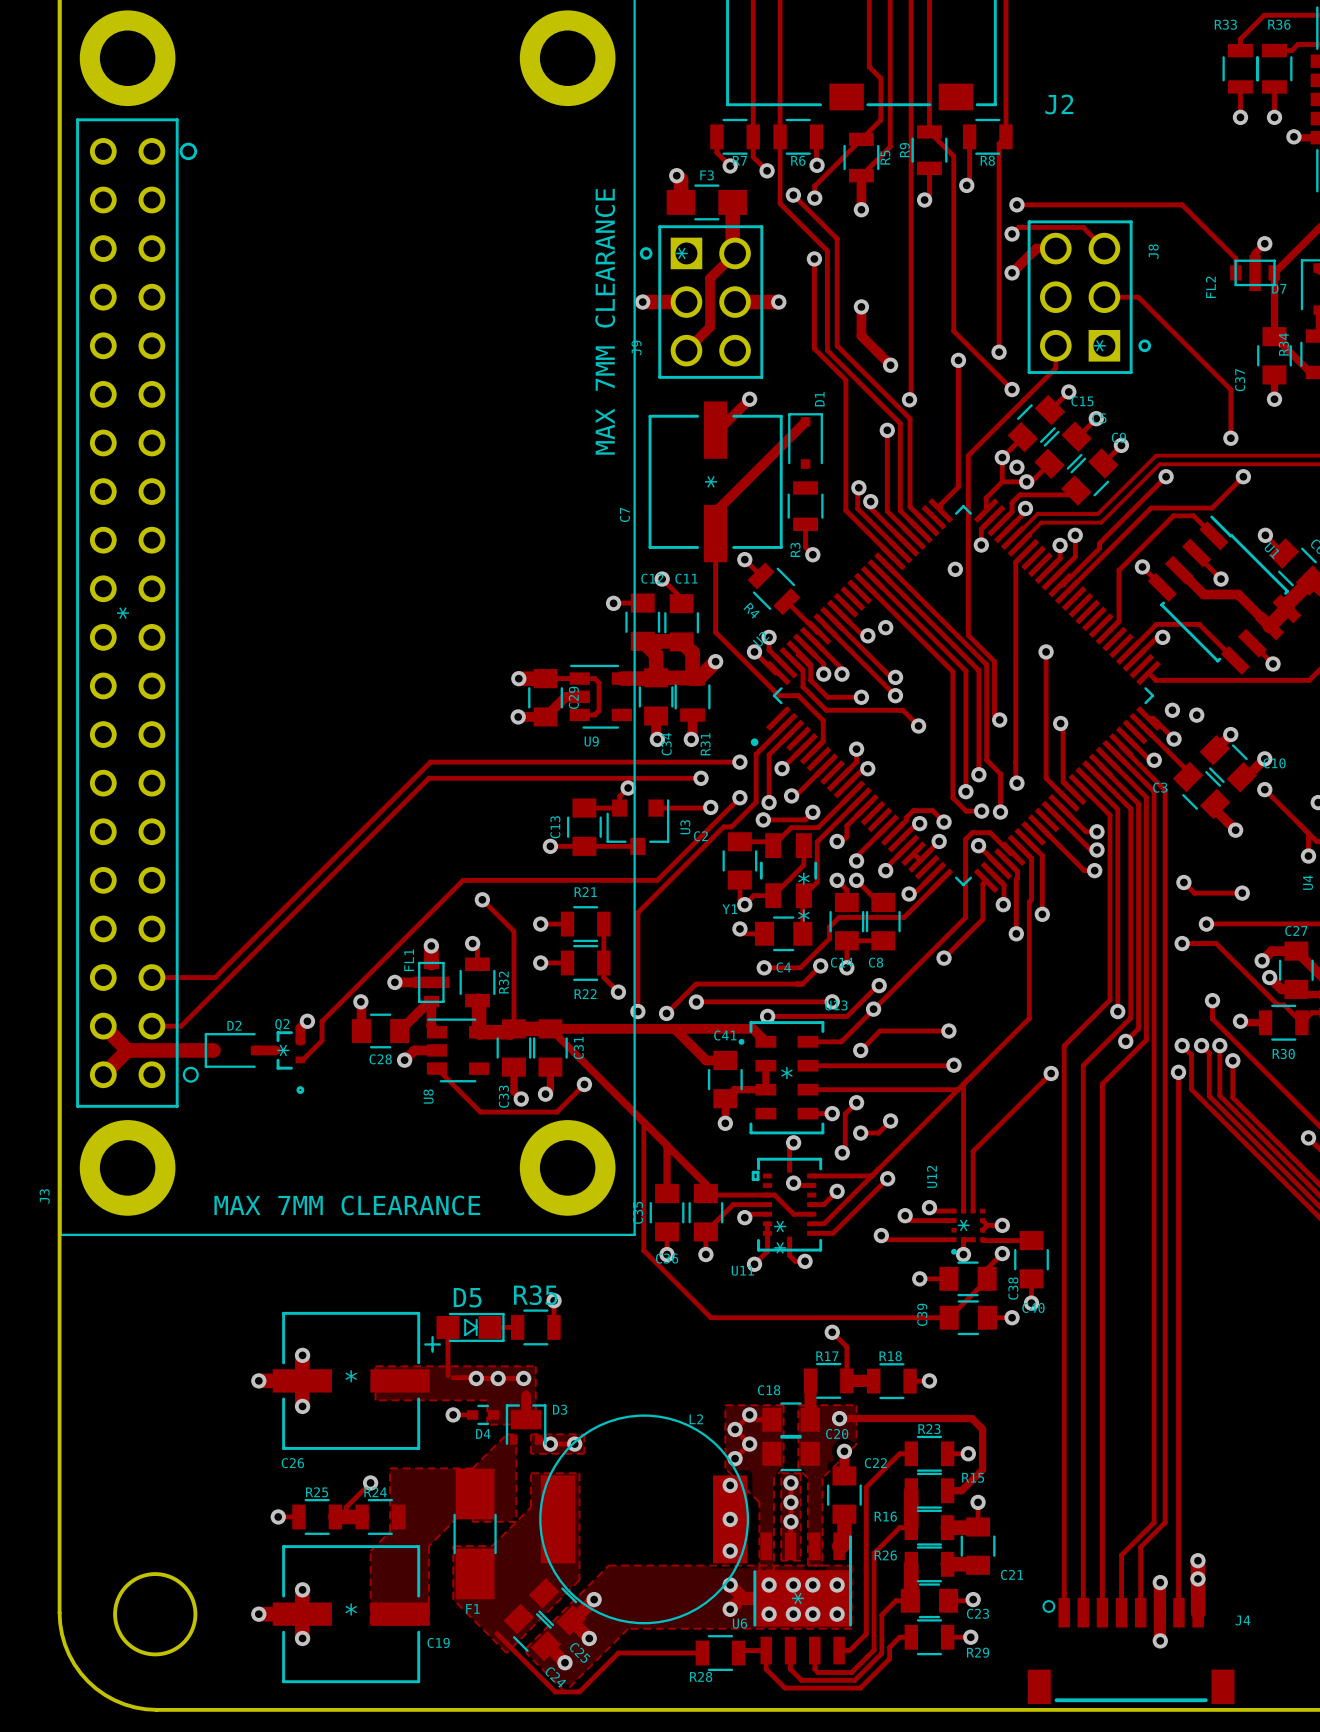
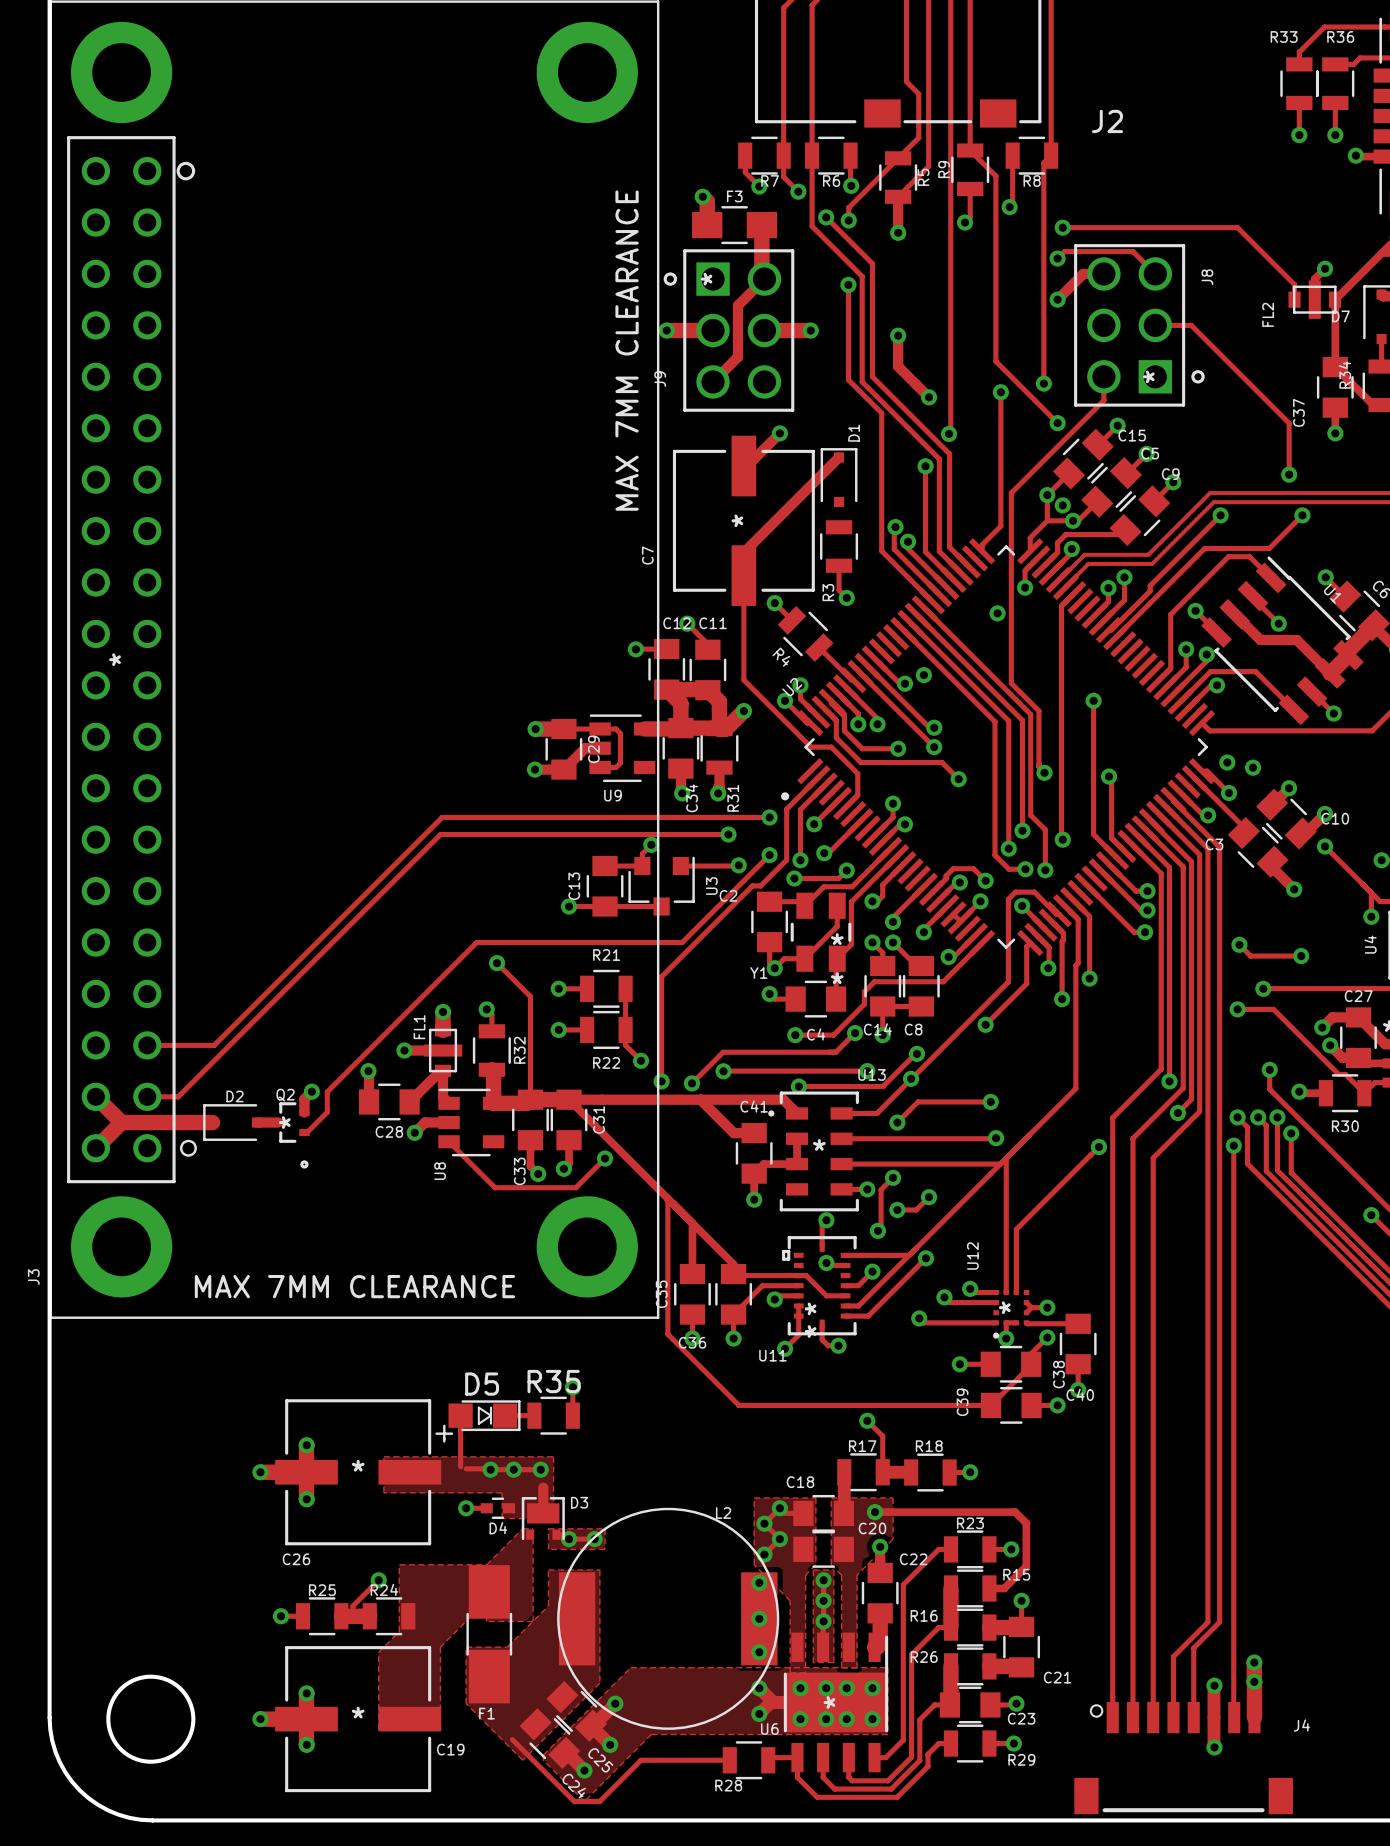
track: none -> (1186, 649) (1186, 667) (1166, 687)
via: none -> (1186, 649)
track: none -> (1206, 654) (1206, 661) (1173, 694)
via: none -> (1206, 654)

